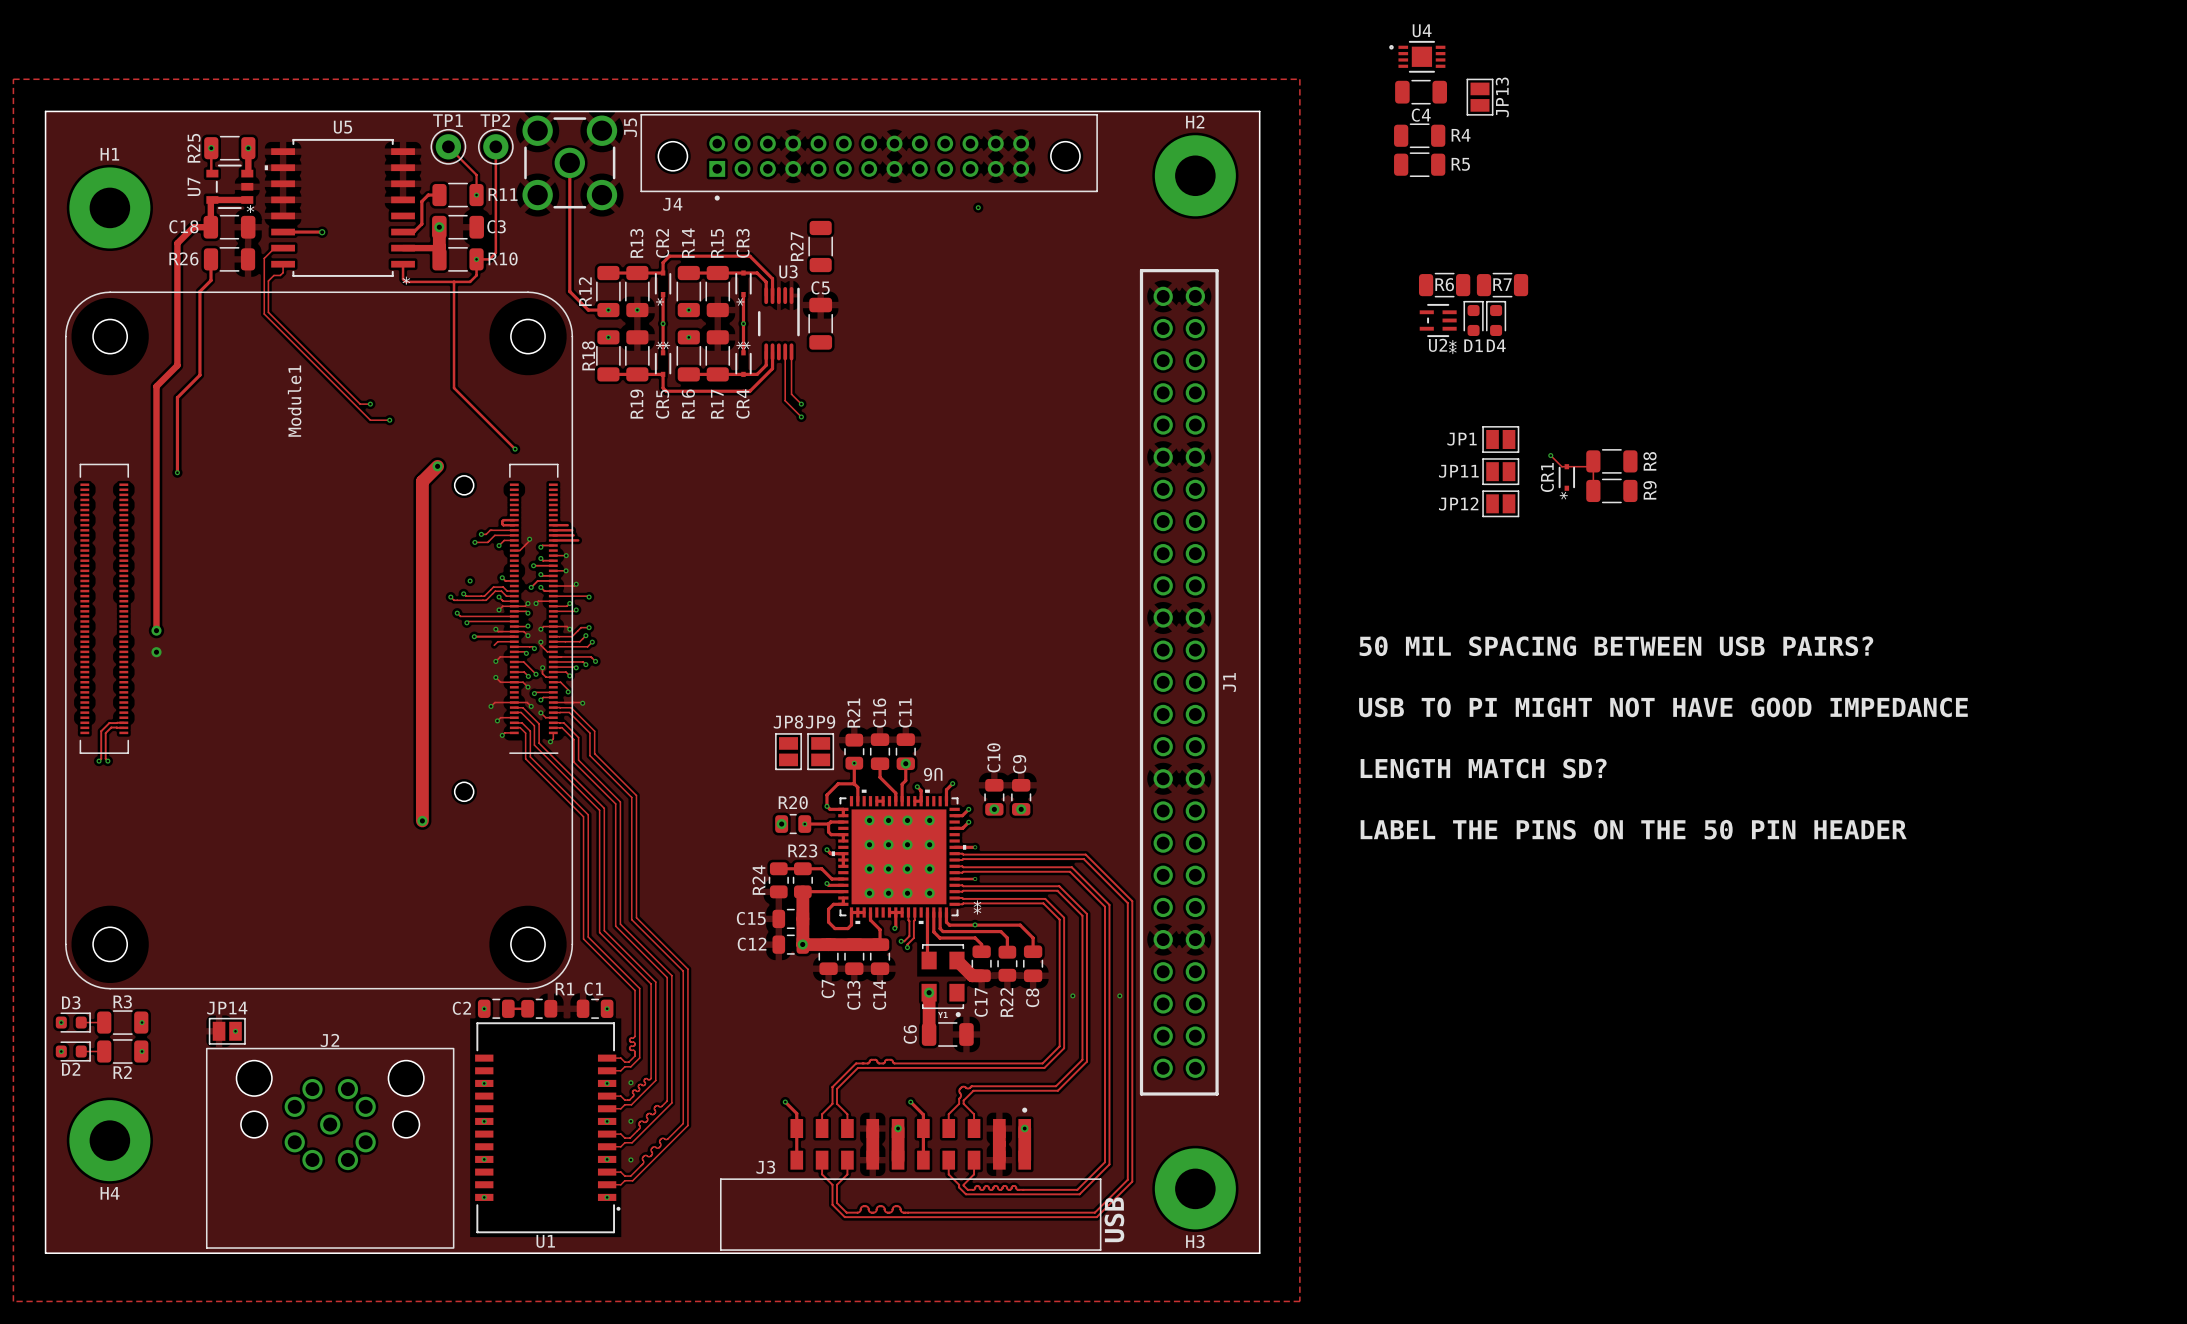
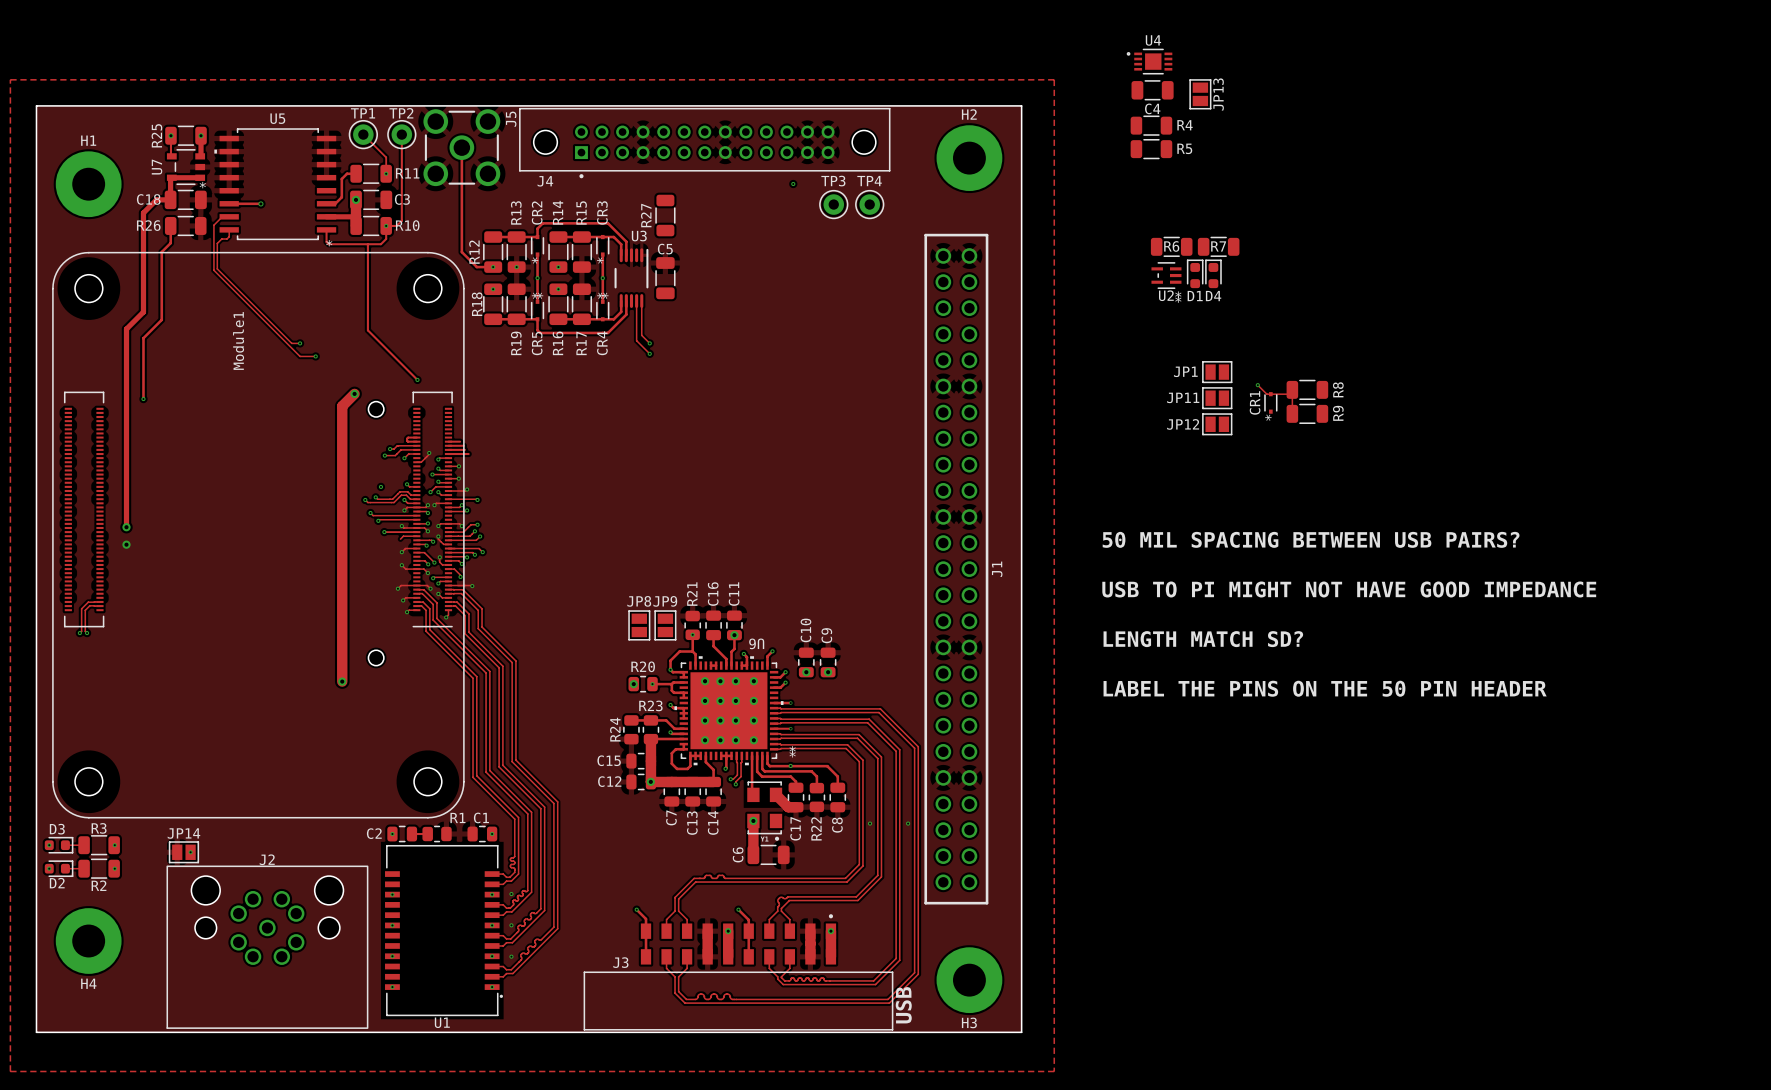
TP3: none -> (833, 204)
TP4: none -> (869, 204)

